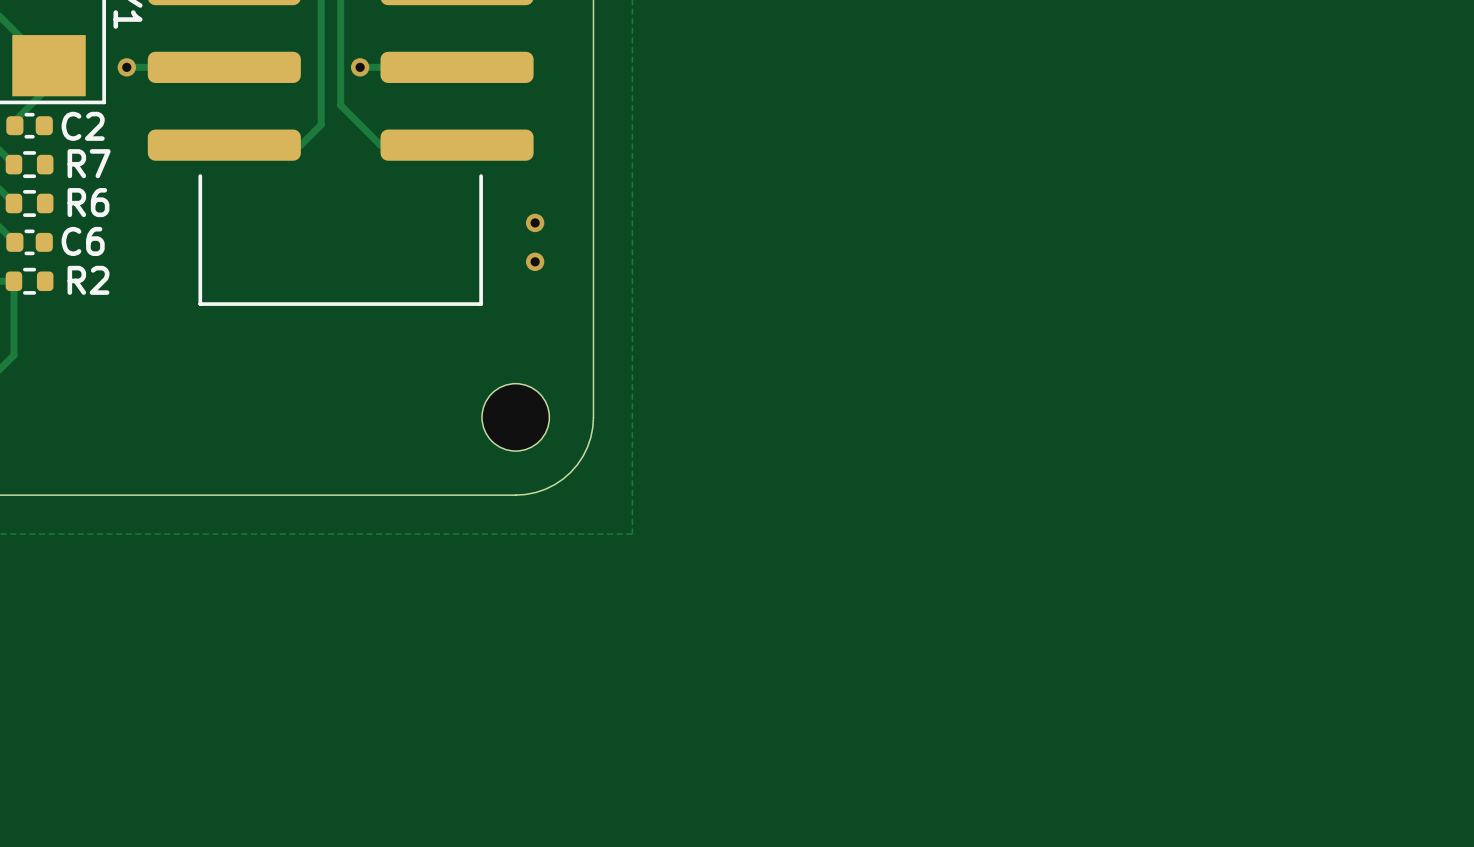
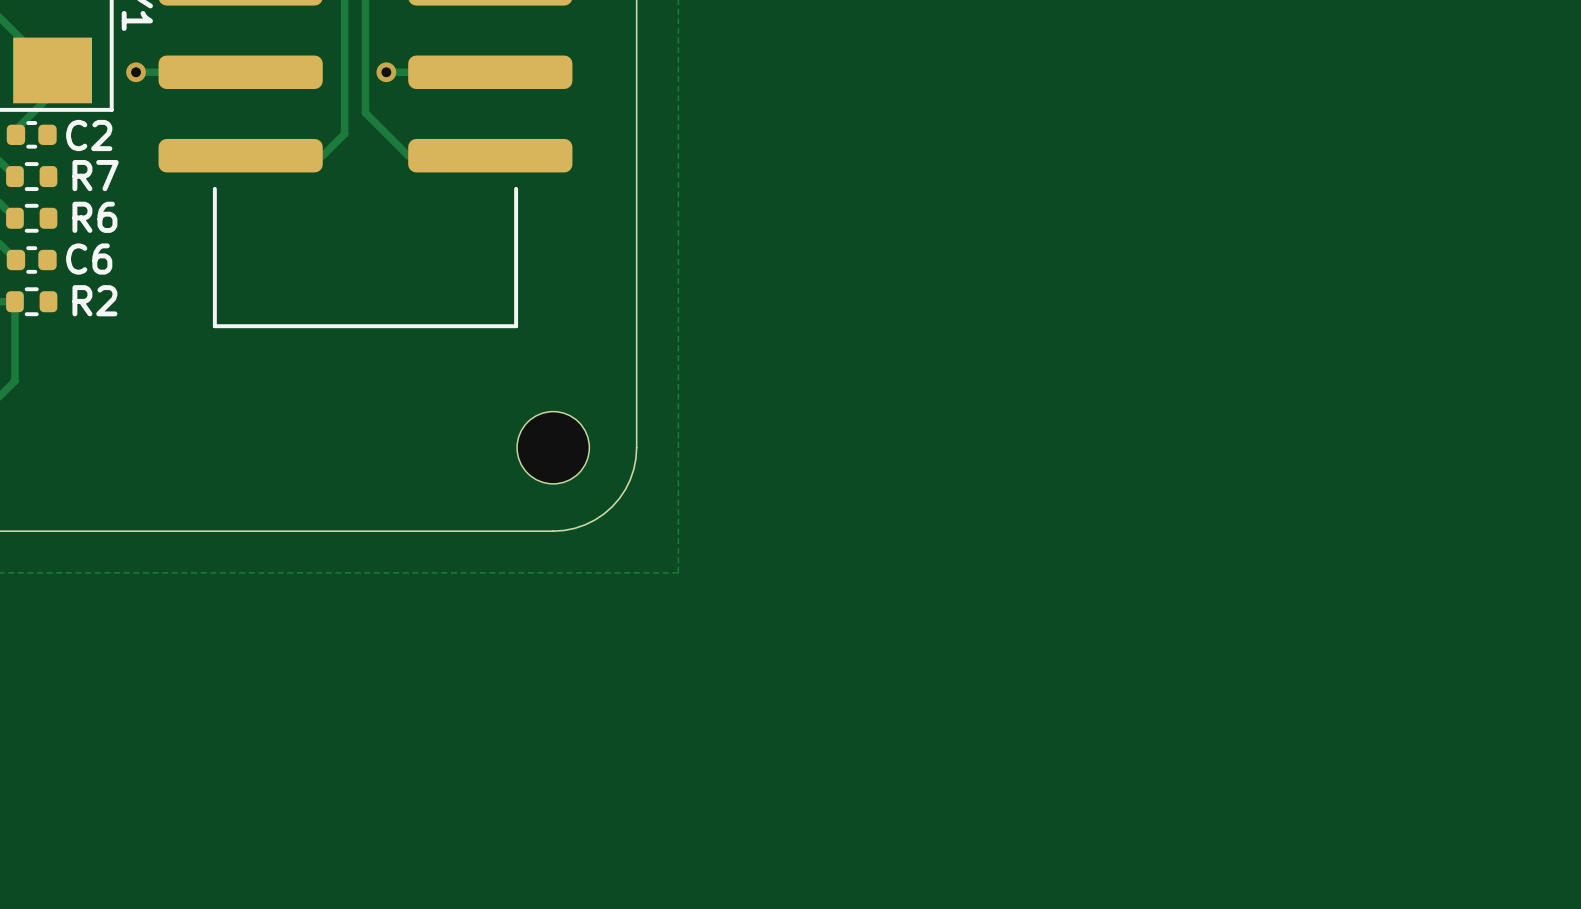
via: (535, 222) -> none
via: (535, 261) -> none

